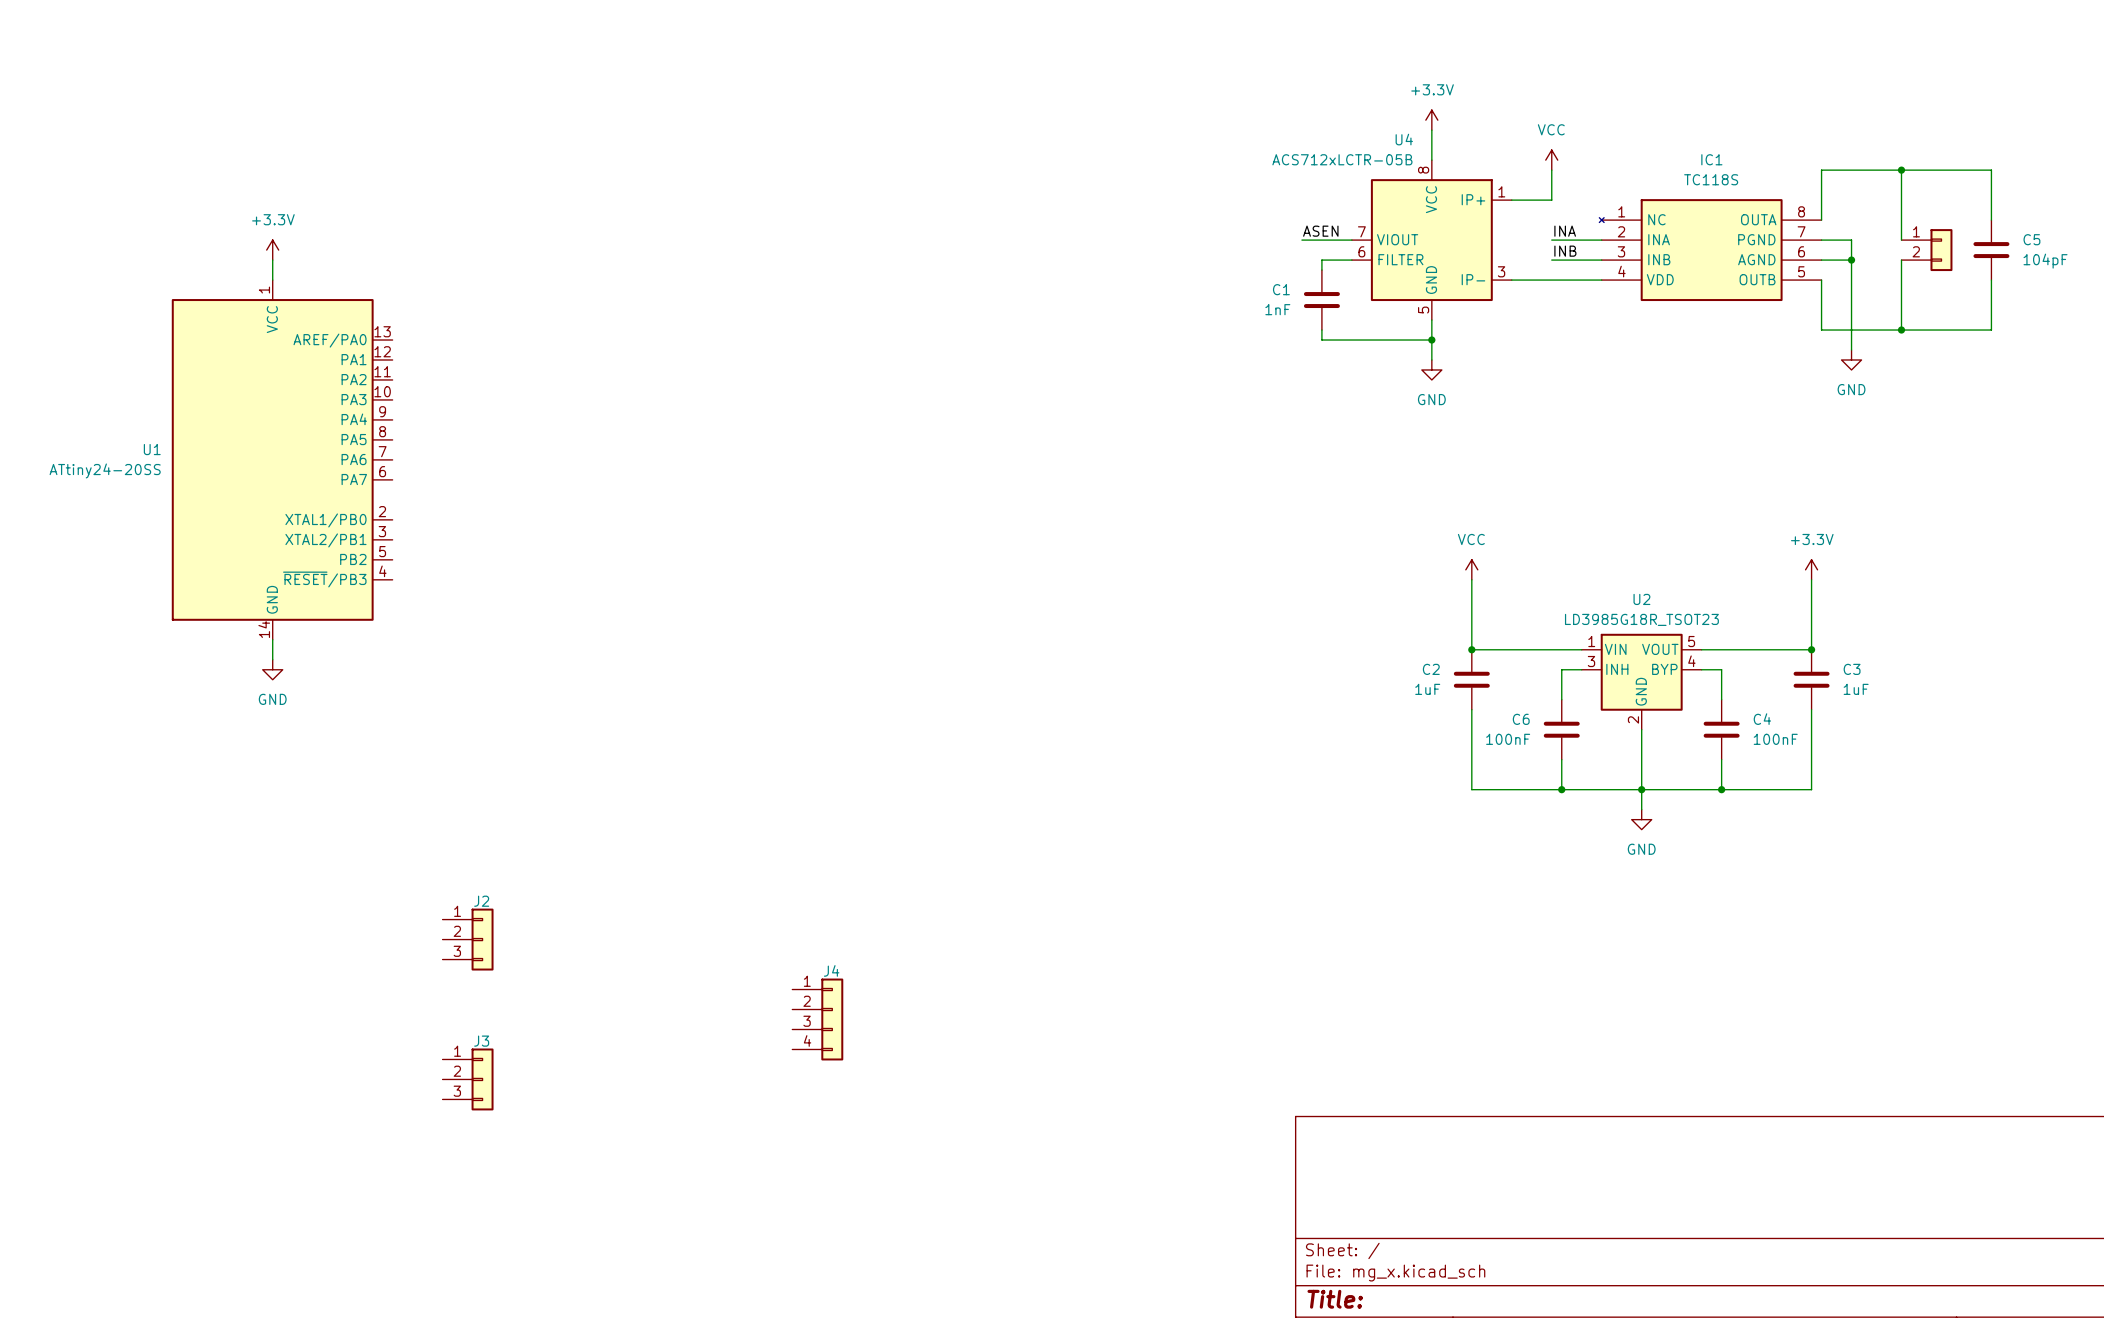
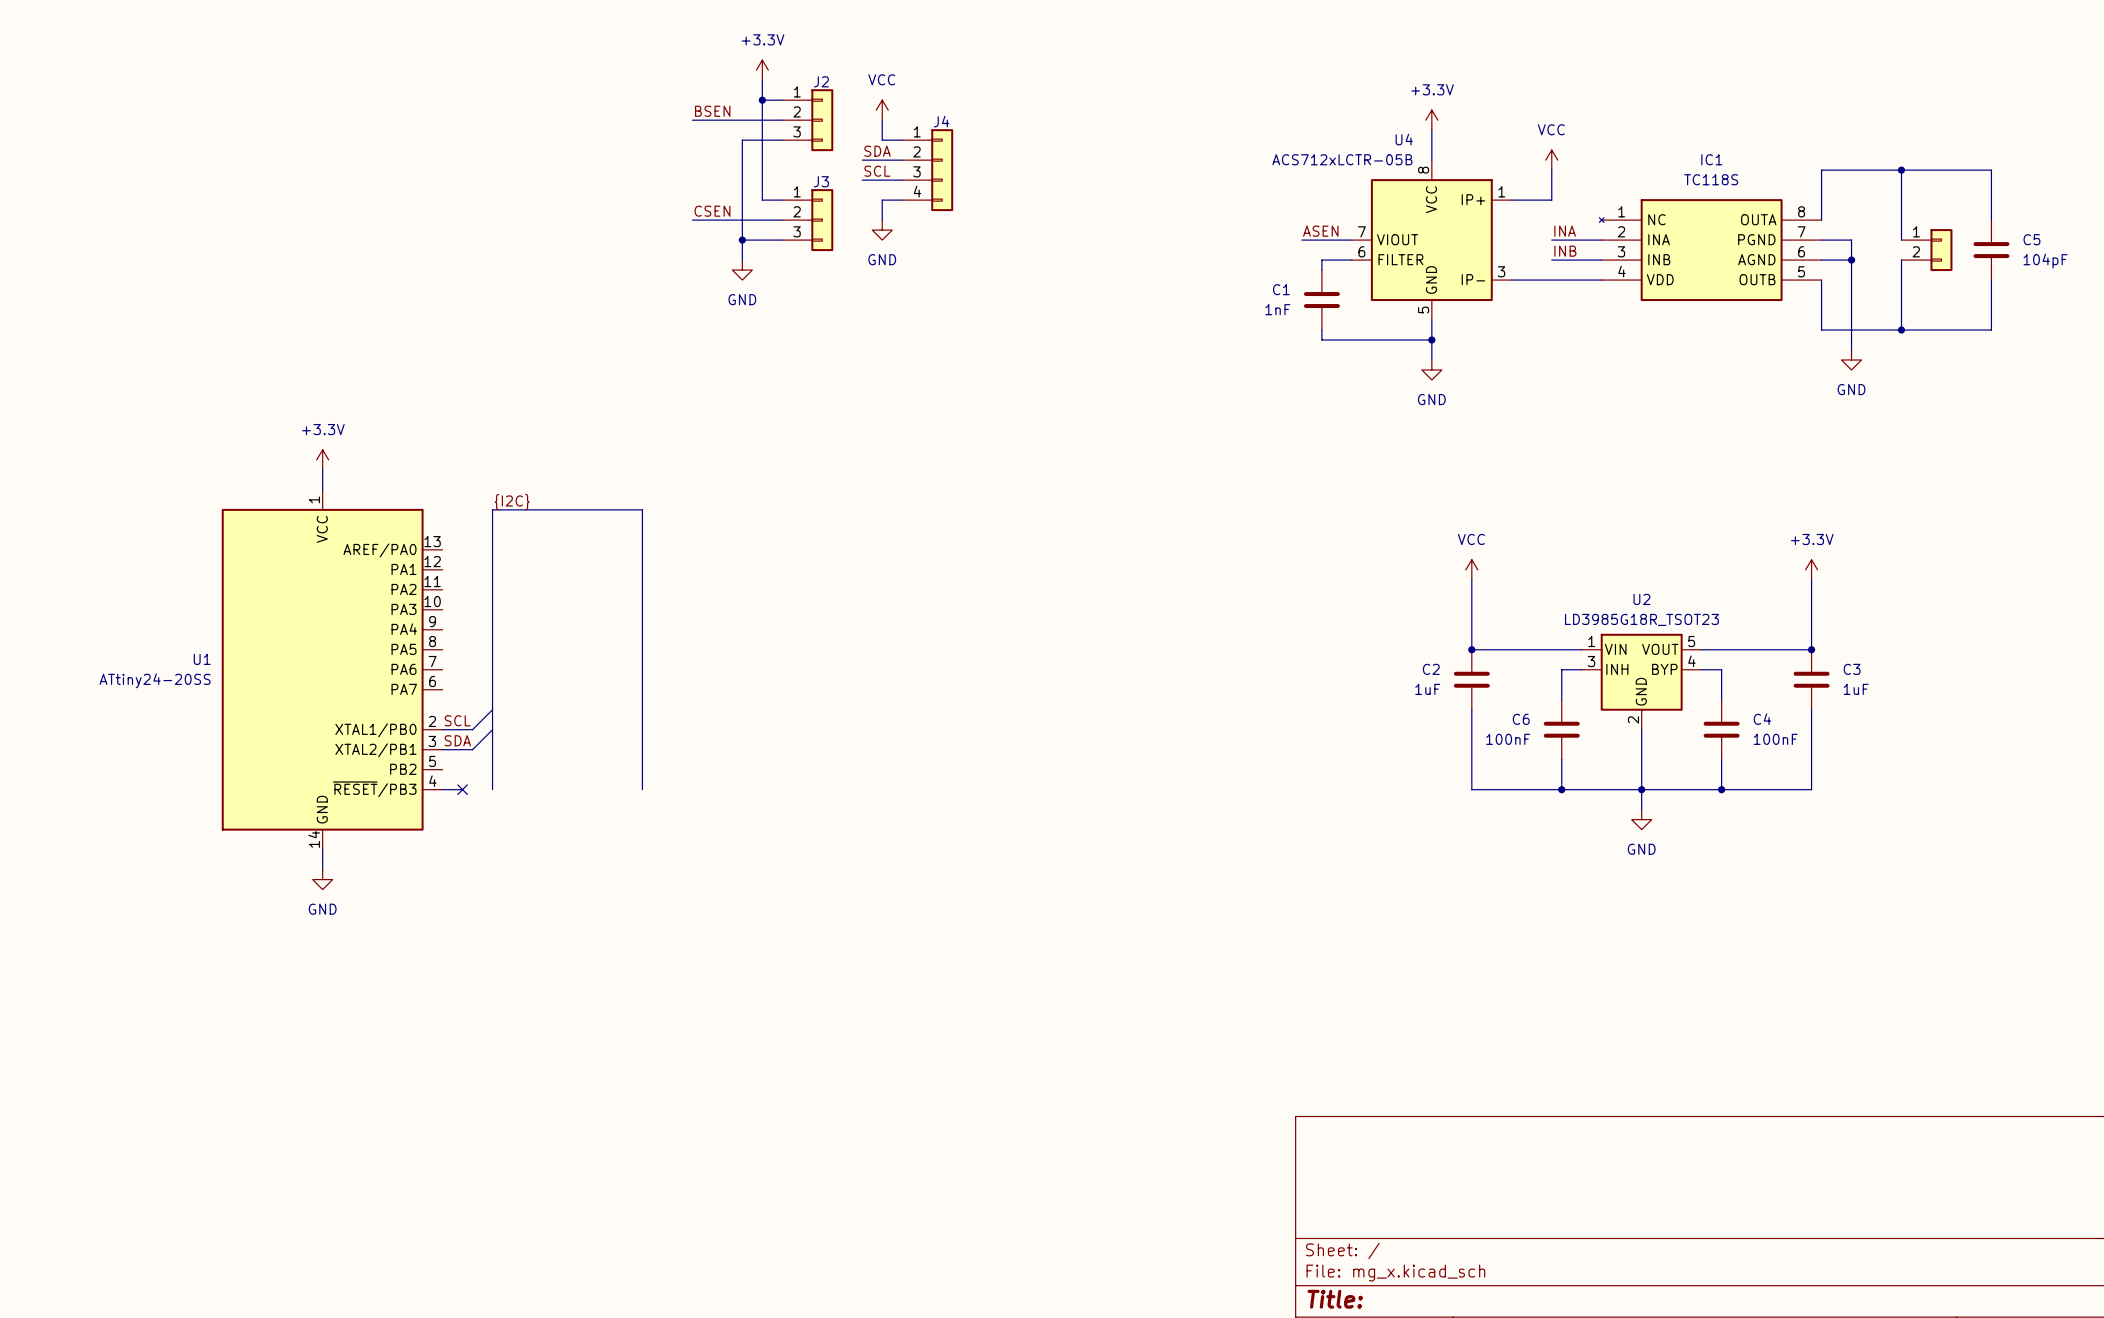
power symbol: none -> +3.3V (762, 70)
wire: none -> (762, 80) (762, 200) (782, 200)
wire: none -> (762, 100) (782, 100)
junction: none -> (762, 100)
power symbol: none -> VCC (882, 110)
label: none -> BSEN (712, 111)
wire: none -> (692, 120) (782, 120)
wire: none -> (882, 120) (882, 140) (902, 140)
wire: none -> (782, 140) (742, 140) (742, 260)
label: none -> SDA (877, 151)
wire: none -> (862, 160) (902, 160)
label: none -> SCL (877, 171)
wire: none -> (862, 180) (902, 180)
wire: none -> (902, 200) (882, 200) (882, 220)
label: none -> CSEN (712, 211)
wire: none -> (692, 220) (782, 220)
power symbol: none -> GND (882, 230)
wire: none -> (742, 240) (782, 240)
junction: none -> (742, 240)
power symbol: +3.3V (272, 250) -> none
wire: (272, 260) (272, 280) -> none
power symbol: none -> GND (742, 270)
U1 position: (282, 459) -> (332, 669)
power symbol: none -> +3.3V (322, 459)
label: none -> {I2C} (512, 502)
power symbol: GND (272, 669) -> none
wire: none -> (492, 709) (472, 729) (442, 729)
label: none -> SCL (457, 720)
wire: none -> (492, 729) (472, 749) (442, 749)
label: none -> SDA (457, 740)
wire: none -> (442, 789) (462, 789)
no-connect mark: none -> (462, 789)
bus: none -> (492, 789) (492, 509) (642, 509) (642, 789)
wire: none -> (322, 849) (322, 869)
power symbol: none -> GND (322, 879)
J2 position: (468, 939) -> (807, 120)
J4 position: (817, 1019) -> (927, 170)
J3 position: (468, 1079) -> (807, 220)

